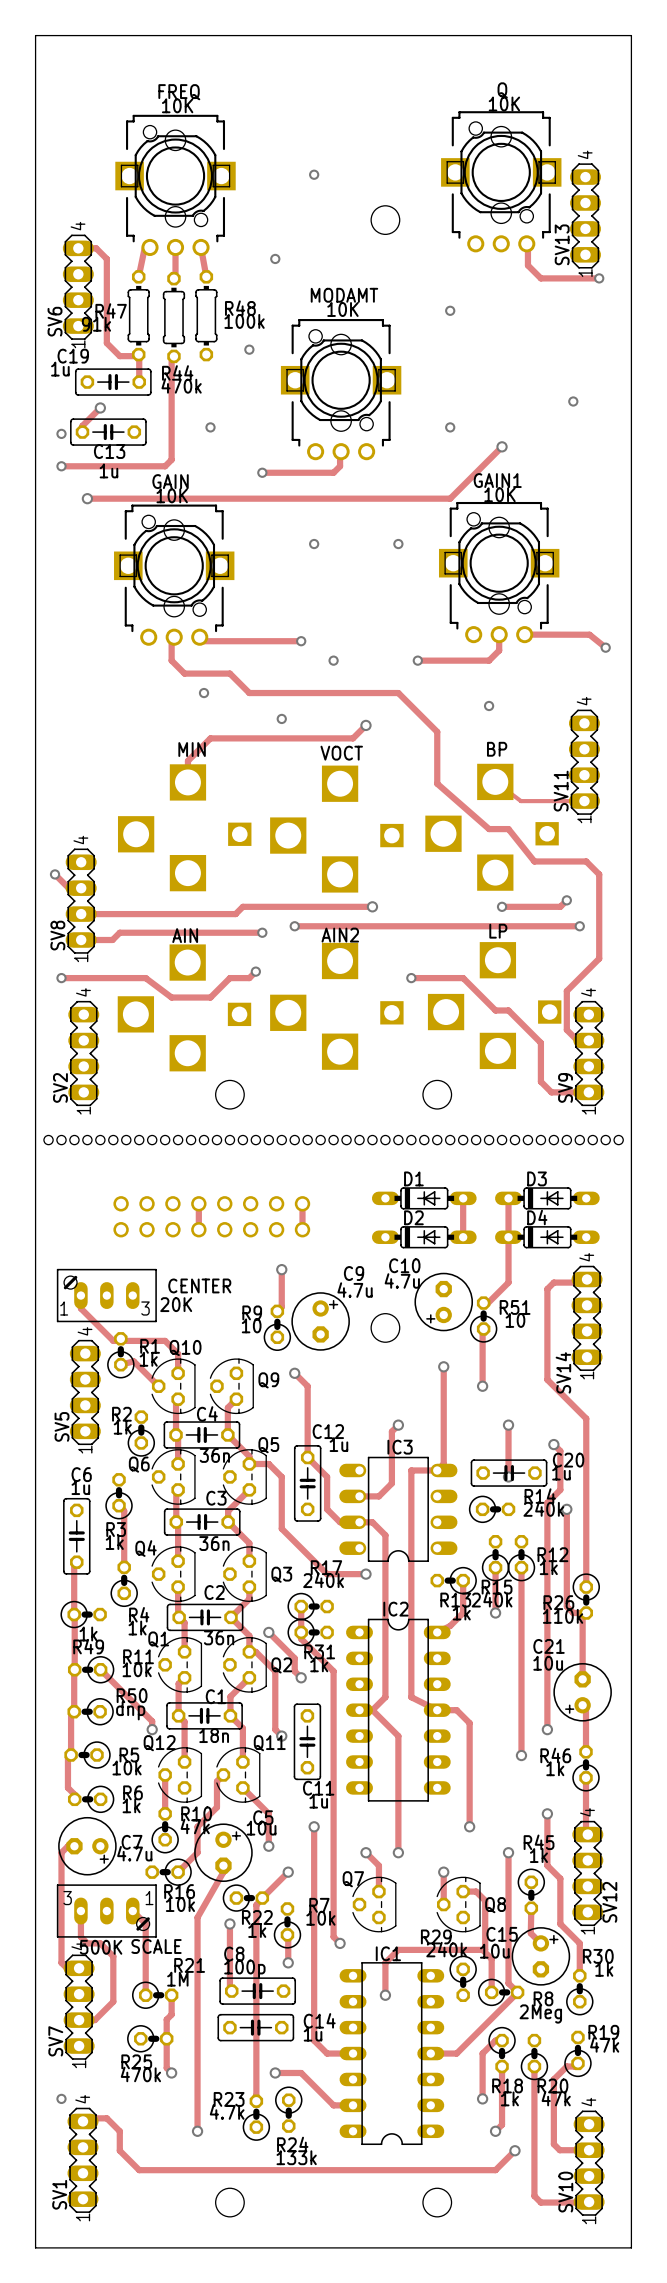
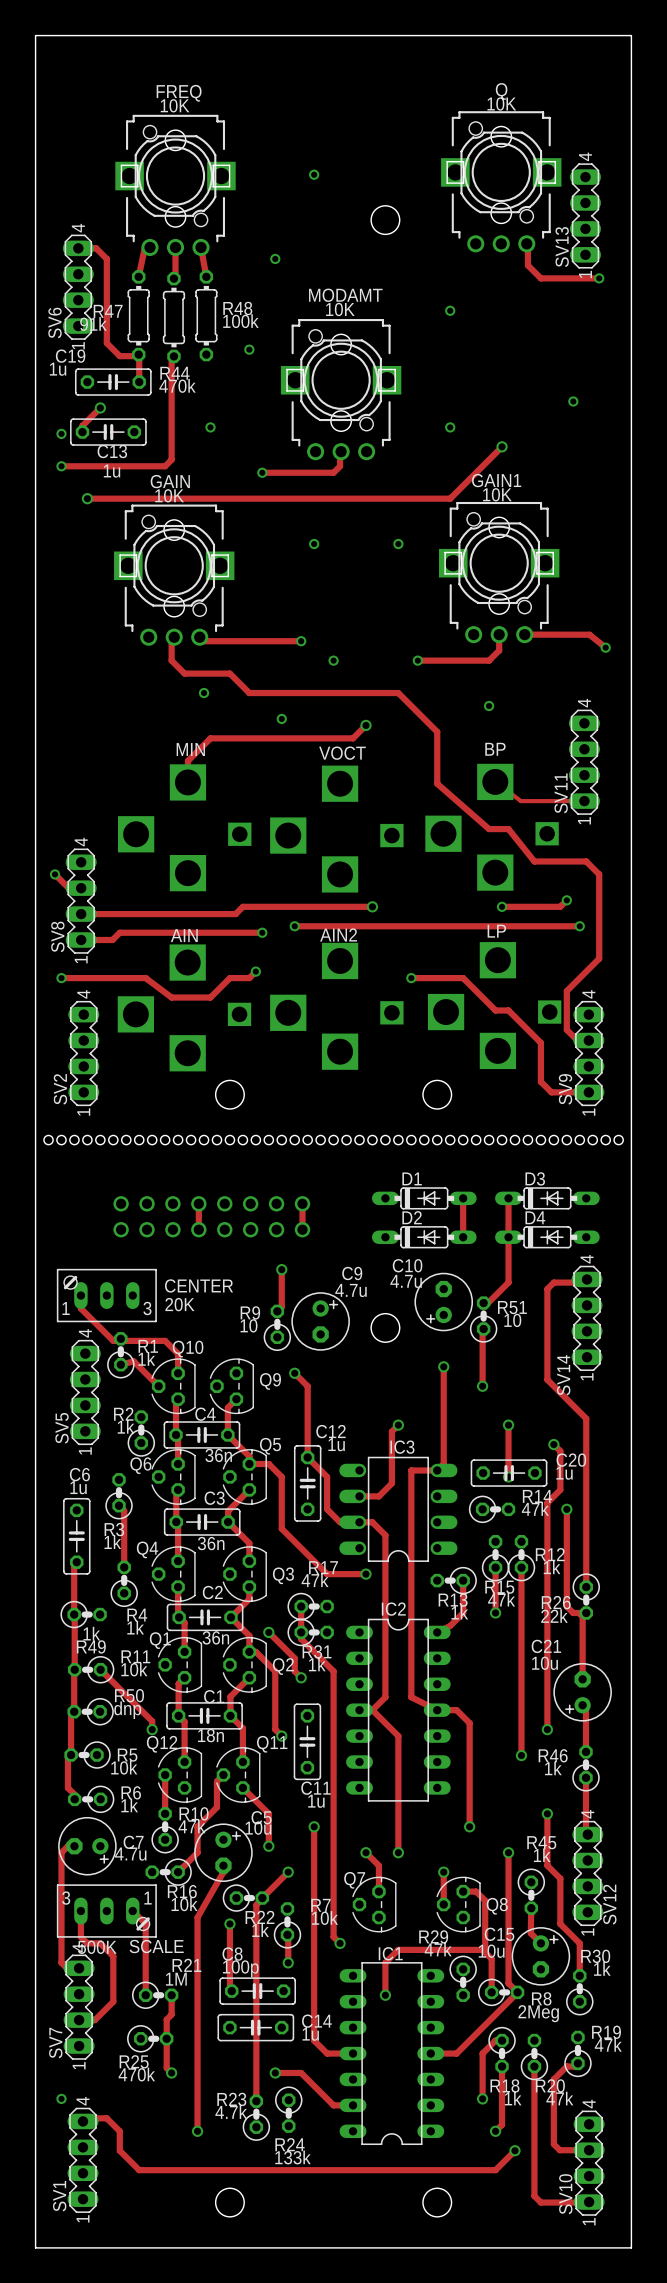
R14 value: 240k (543, 1509) -> 47k (535, 1509)
R17 value: 240k (323, 1580) -> 47k (315, 1580)
R15 value: 240k (492, 1599) -> 47k (501, 1599)
R26 value: 110k (563, 1616) -> 22k (554, 1616)
R29 value: 240k (446, 1949) -> 47k (438, 1949)

